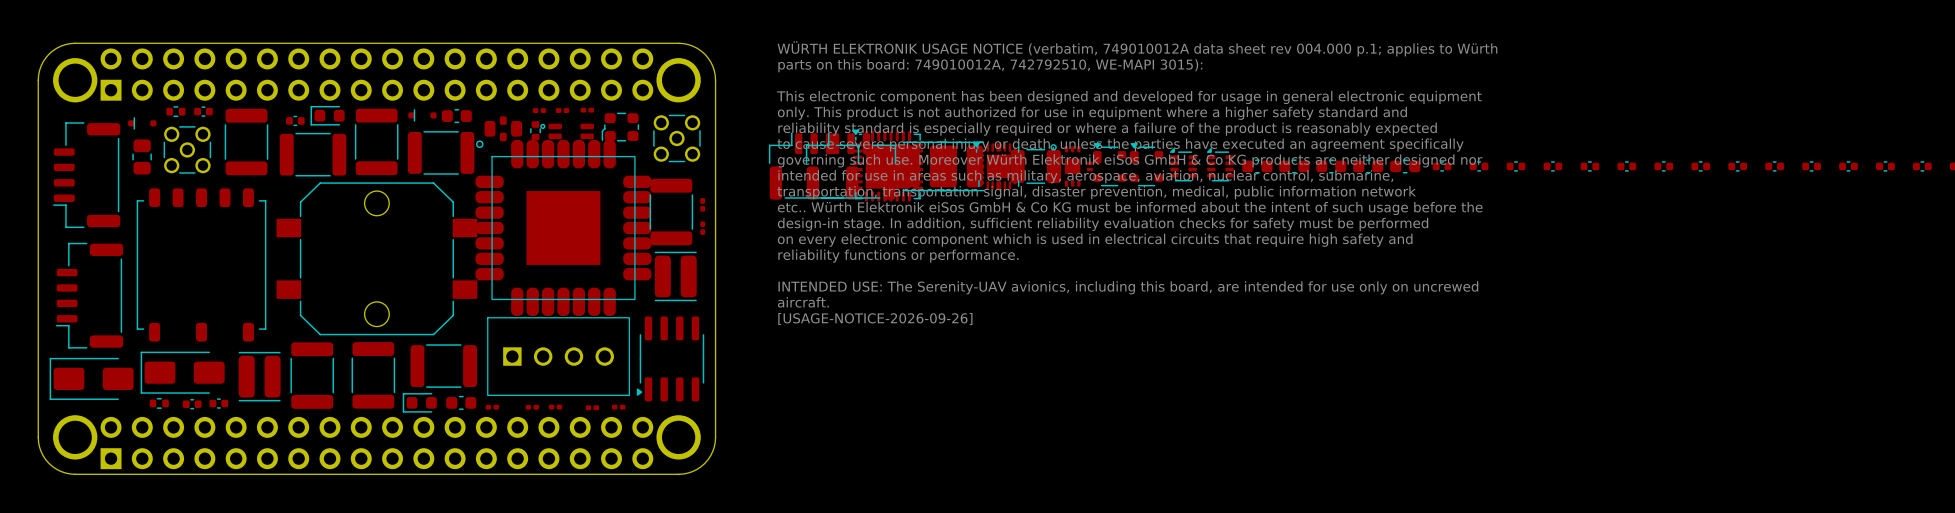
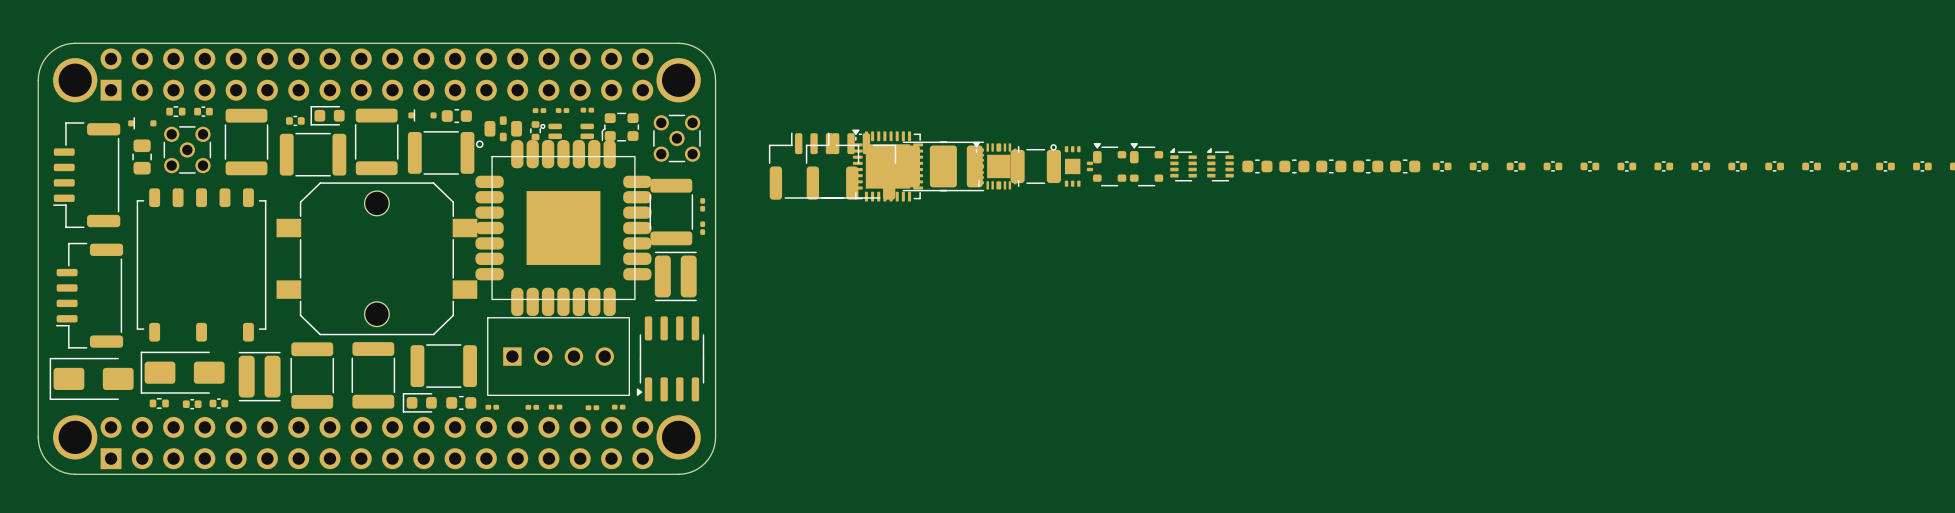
text: WÜRTH ELEKTRONIK USAGE NOTICE (verbatim, 749010012A data sheet rev 004.000 p.1; applies to Würth (1137, 48) -> none
text: parts on this board: 749010012A, 742792510, WE-MAPI 3015): (990, 65) -> none
text: This electronic component has been designed and developed for usage in general electronic equipment (1129, 97) -> none
text: only. This product is not authorized for use in equipment where a higher safety standard and (1092, 113) -> none
text: reliability standard is especially required or where a failure of the product is reasonably expected (1107, 129) -> none
text: to cause severe personal injury or death, unless the parties have executed an agreement specifically (1120, 145) -> none
text: governing such use. Moreover Würth Elektronik eiSos GmbH & Co KG products are neither designed nor (1130, 160) -> none
text: intended for use in areas such as military, aerospace, aviation, nuclear control, submarine, (1085, 176) -> none
text: transportation, transportation signal, disaster prevention, medical, public information network (1096, 192) -> none
text: etc.. Würth Elektronik eiSos GmbH & Co KG must be informed about the intent of such usage before the (1130, 208) -> none
text: design-in stage. In addition, sufficient reliability evaluation checks for safety must be performed (1103, 224) -> none
text: on every electronic component which is used in electrical circuits that require high safety and (1095, 240) -> none
text: reliability functions or performance. (898, 256) -> none
text: INTENDED USE: The Serenity-UAV avionics, including this board, are intended for use only on uncrewed (1128, 287) -> none
text: aircraft. (803, 302) -> none
text: [USAGE-NOTICE-2026-09-26] (875, 319) -> none

